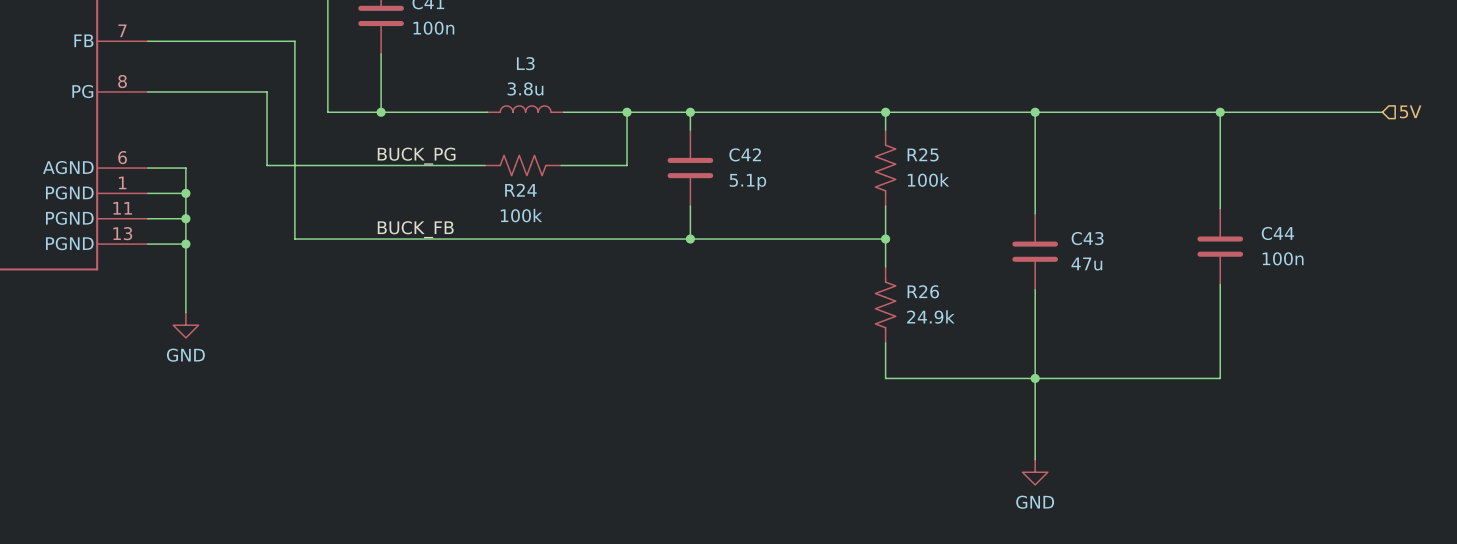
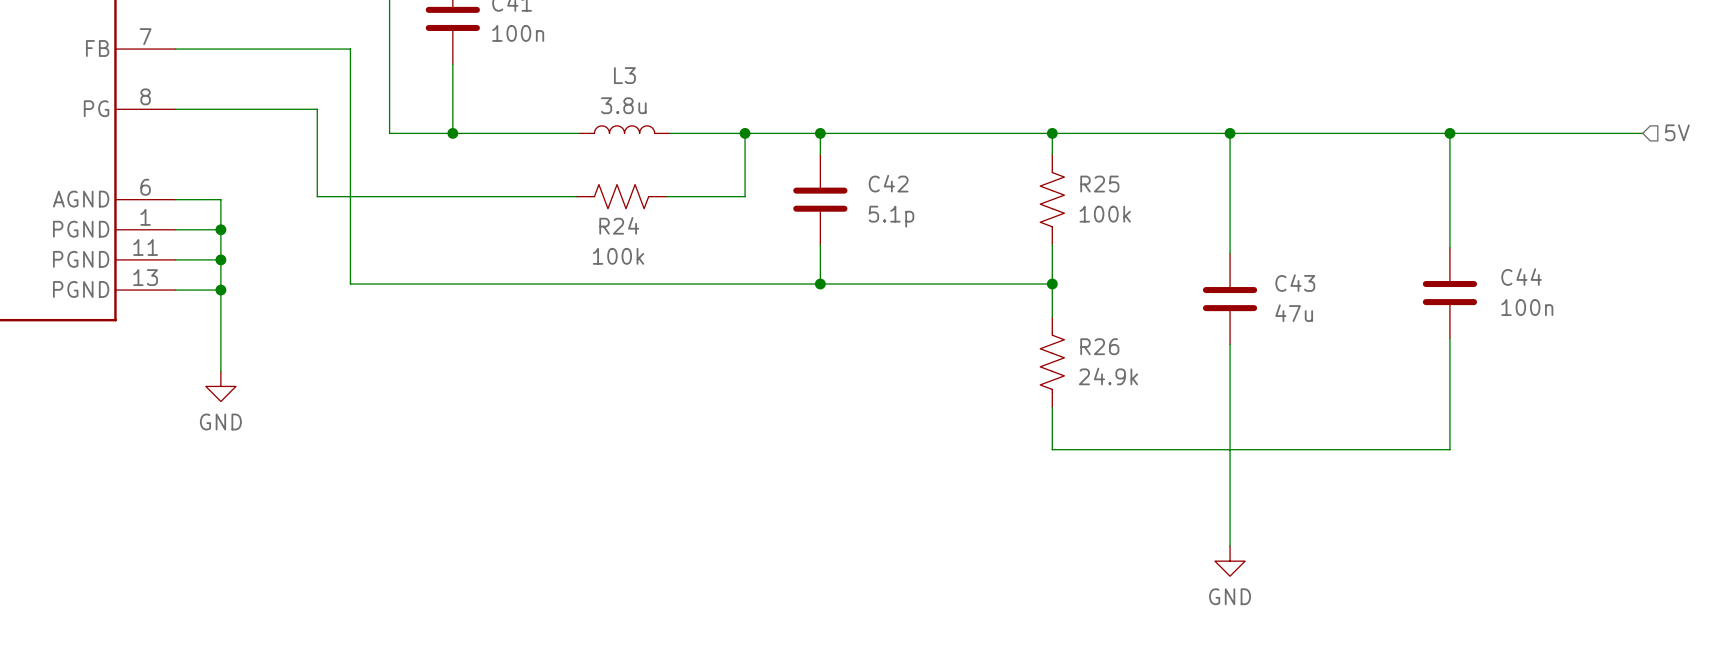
label: BUCK_PG (416, 156) -> none
label: BUCK_FB (415, 229) -> none
junction: (1035, 378) -> none

